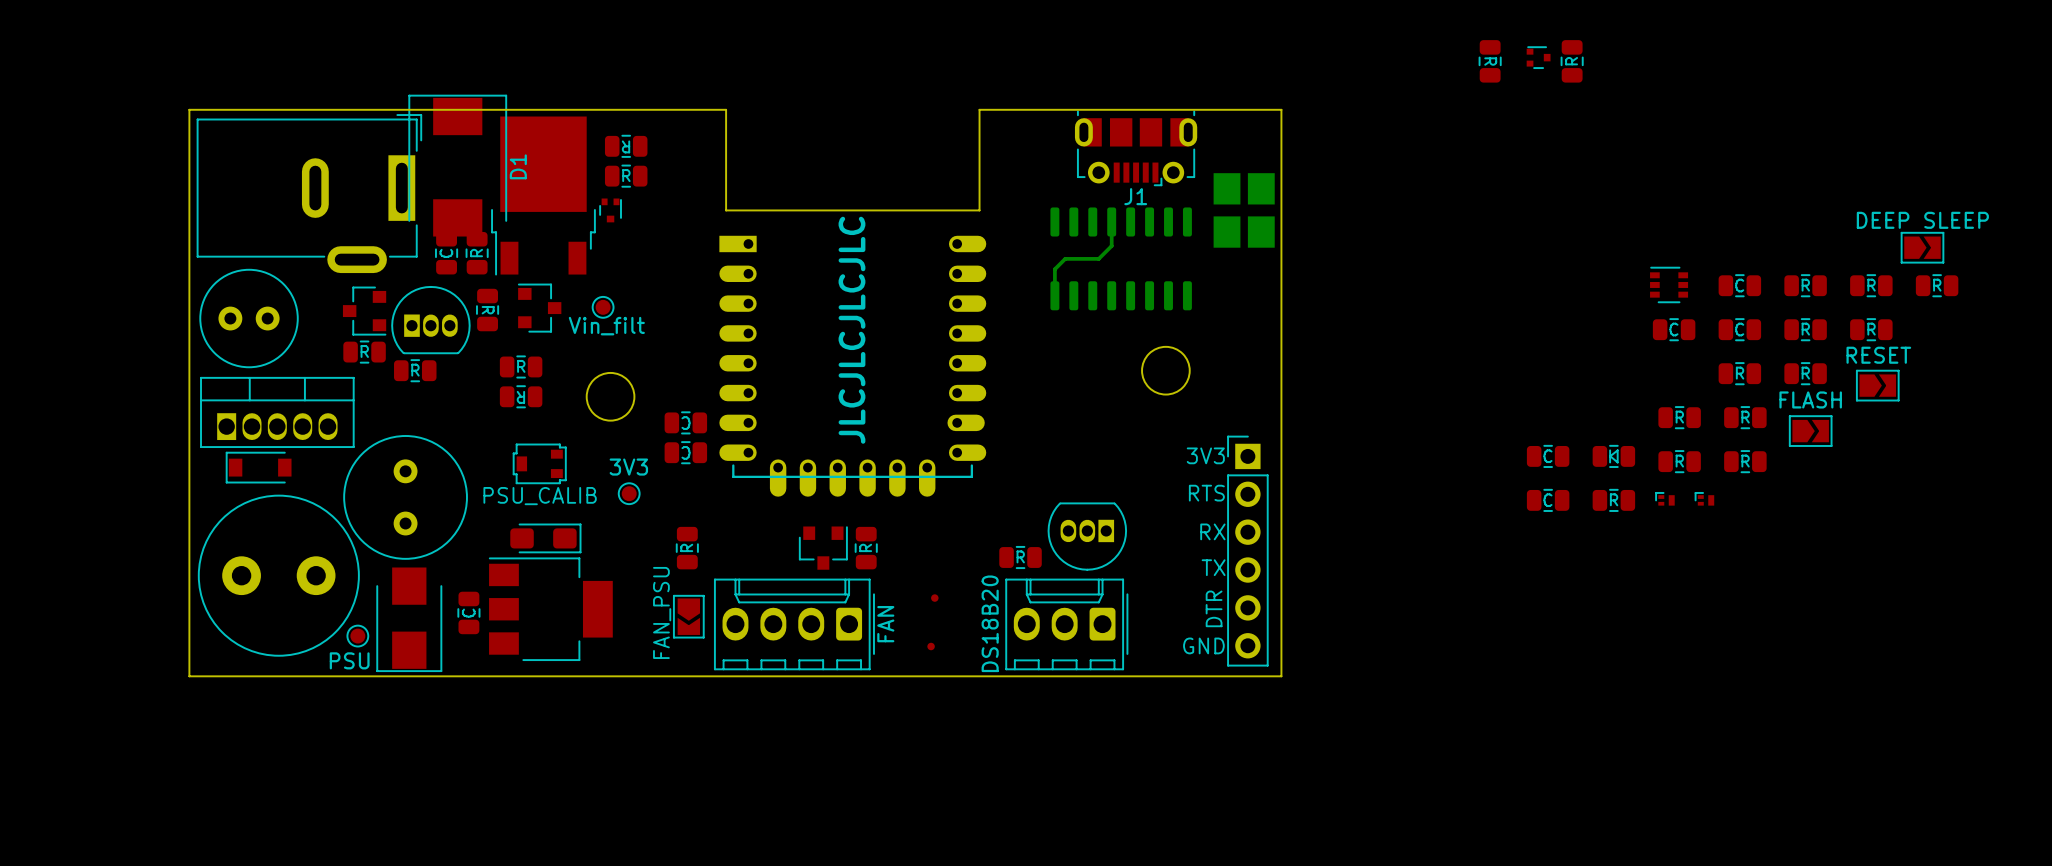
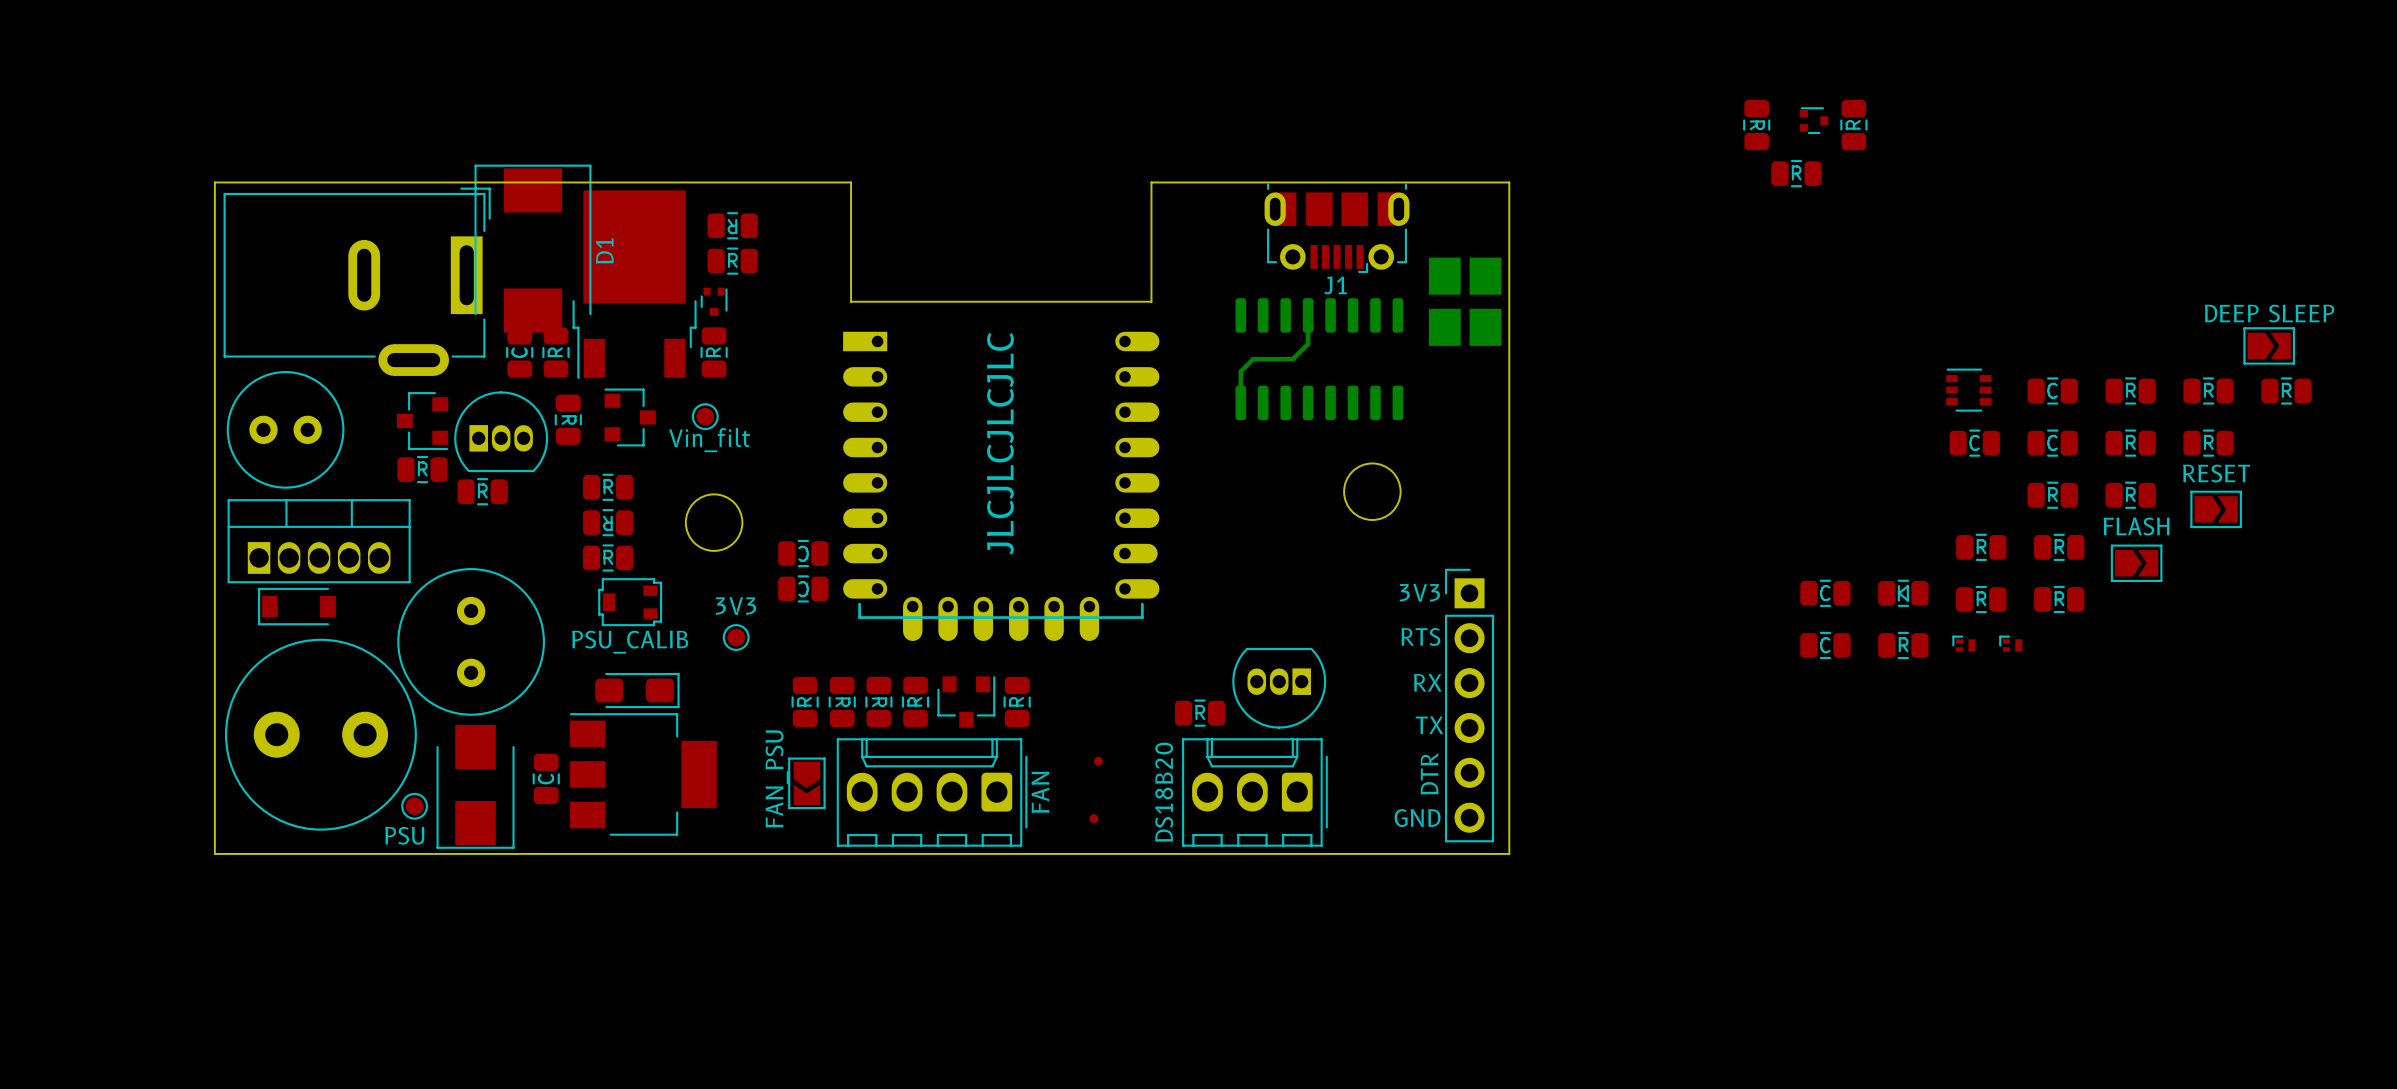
part: none -> (1796, 173)
part: none -> (714, 352)
part: none -> (608, 557)
part: none -> (842, 701)
part: none -> (878, 701)
part: none -> (915, 701)

